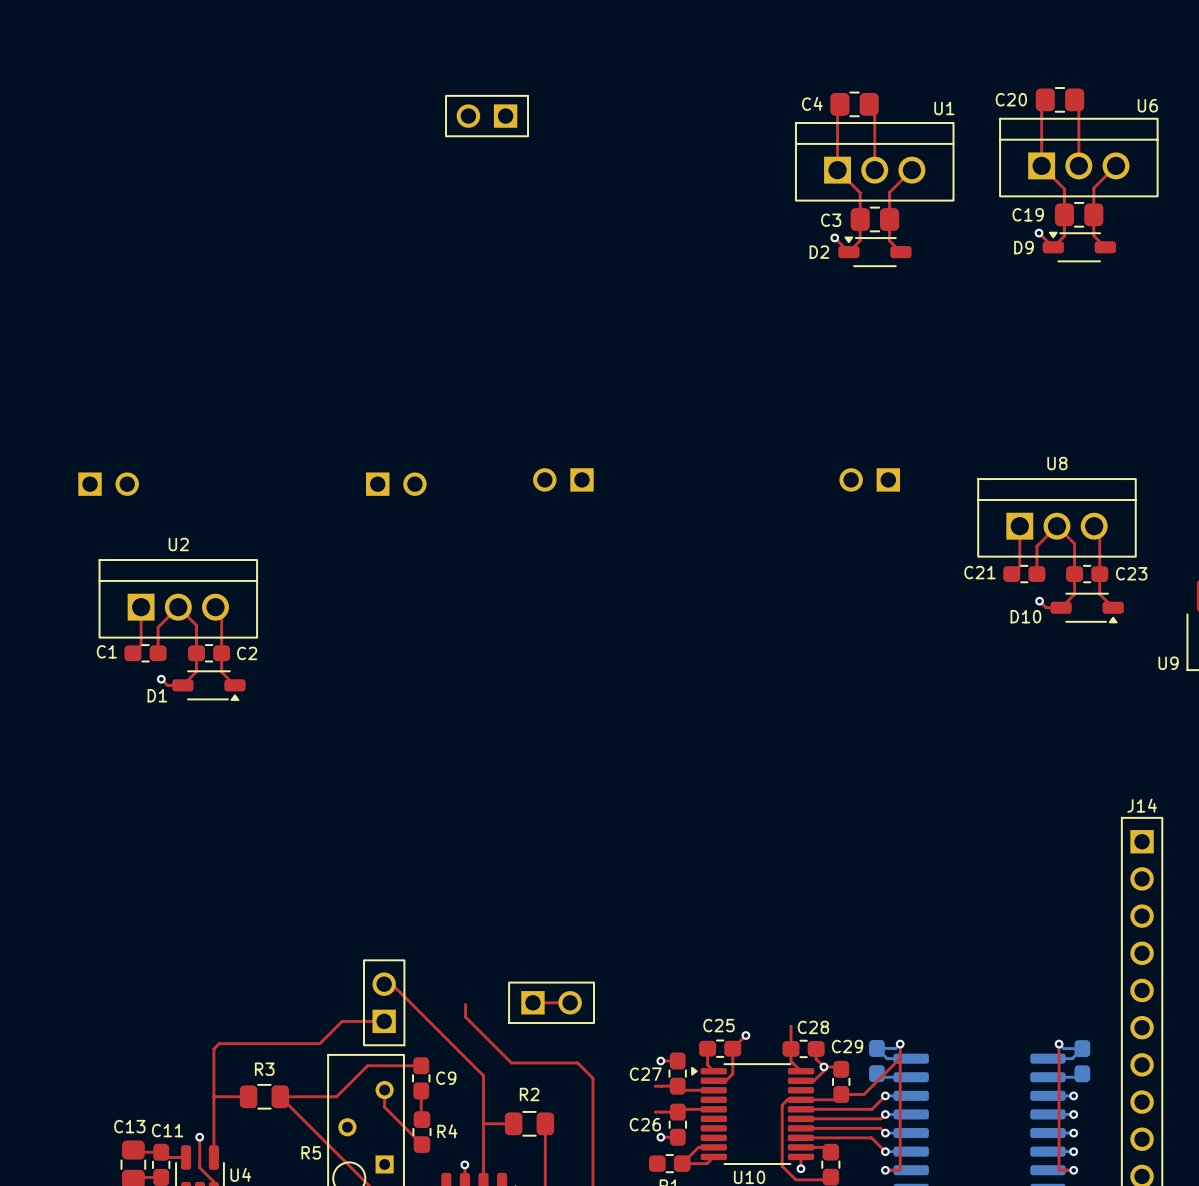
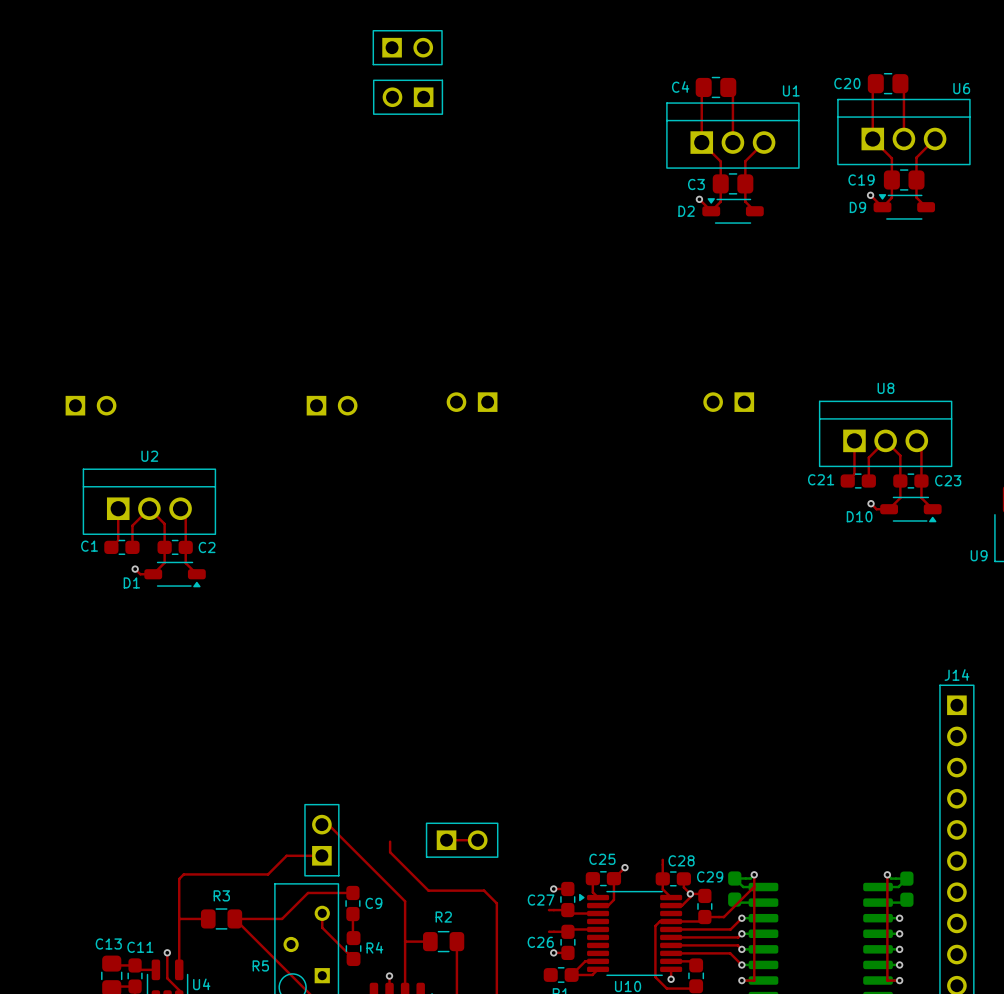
part: none -> (407, 47)

